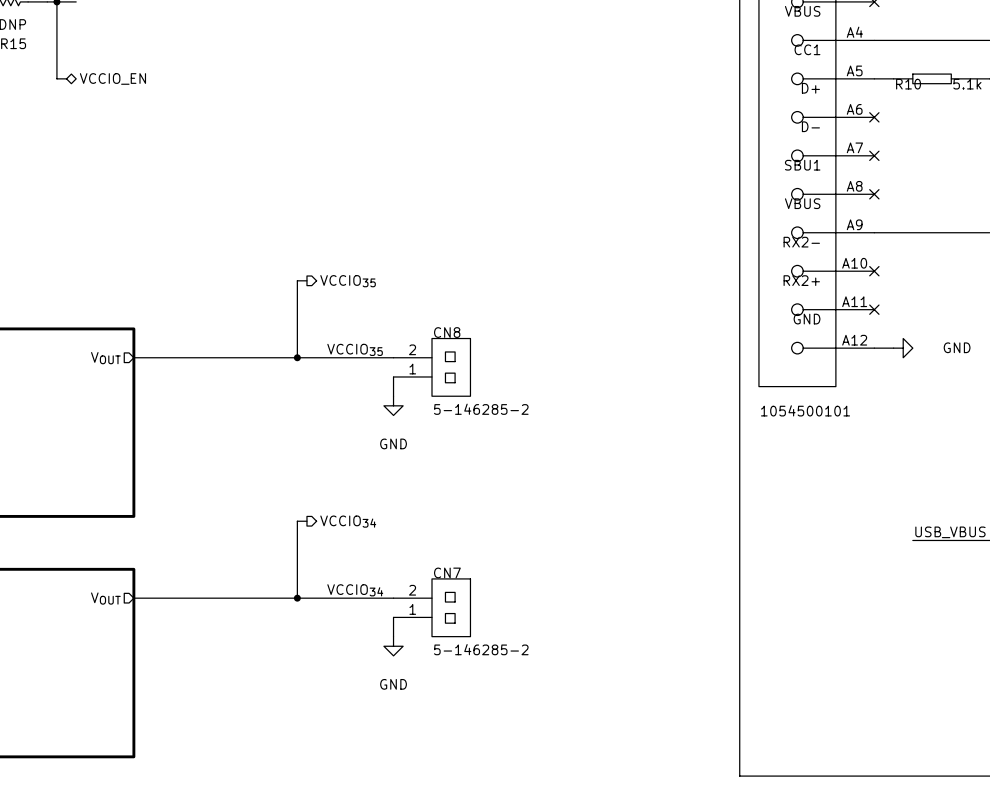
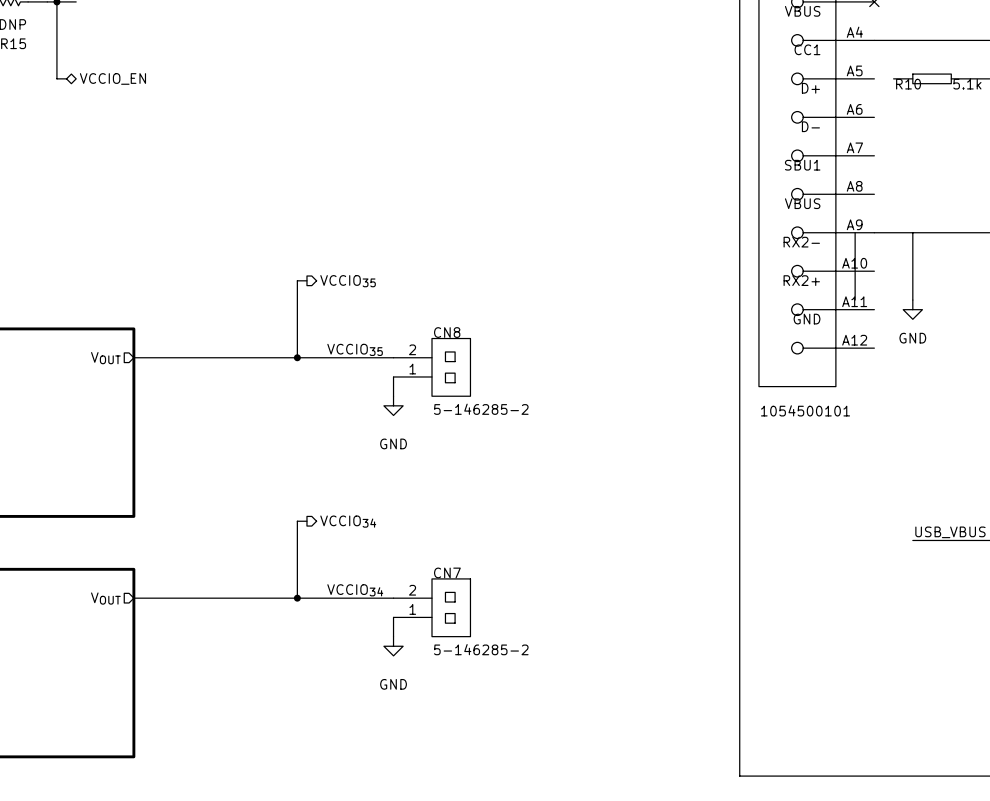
wire: (874, 78) (893, 78) -> none
no-connect mark: (874, 117) -> none
no-connect mark: (874, 155) -> none
no-connect mark: (874, 194) -> none
wire: none -> (855, 232) (855, 300)
wire: none -> (912, 232) (912, 300)
no-connect mark: (874, 271) -> none
no-connect mark: (874, 309) -> none
power symbol text position: GND (957, 347) -> GND (912, 338)
wire: (874, 348) (893, 348) -> none
power symbol rotation: 0° (903, 348) -> 90° clockwise (912, 309)
power symbol position: GND (903, 348) -> GND (912, 309)

